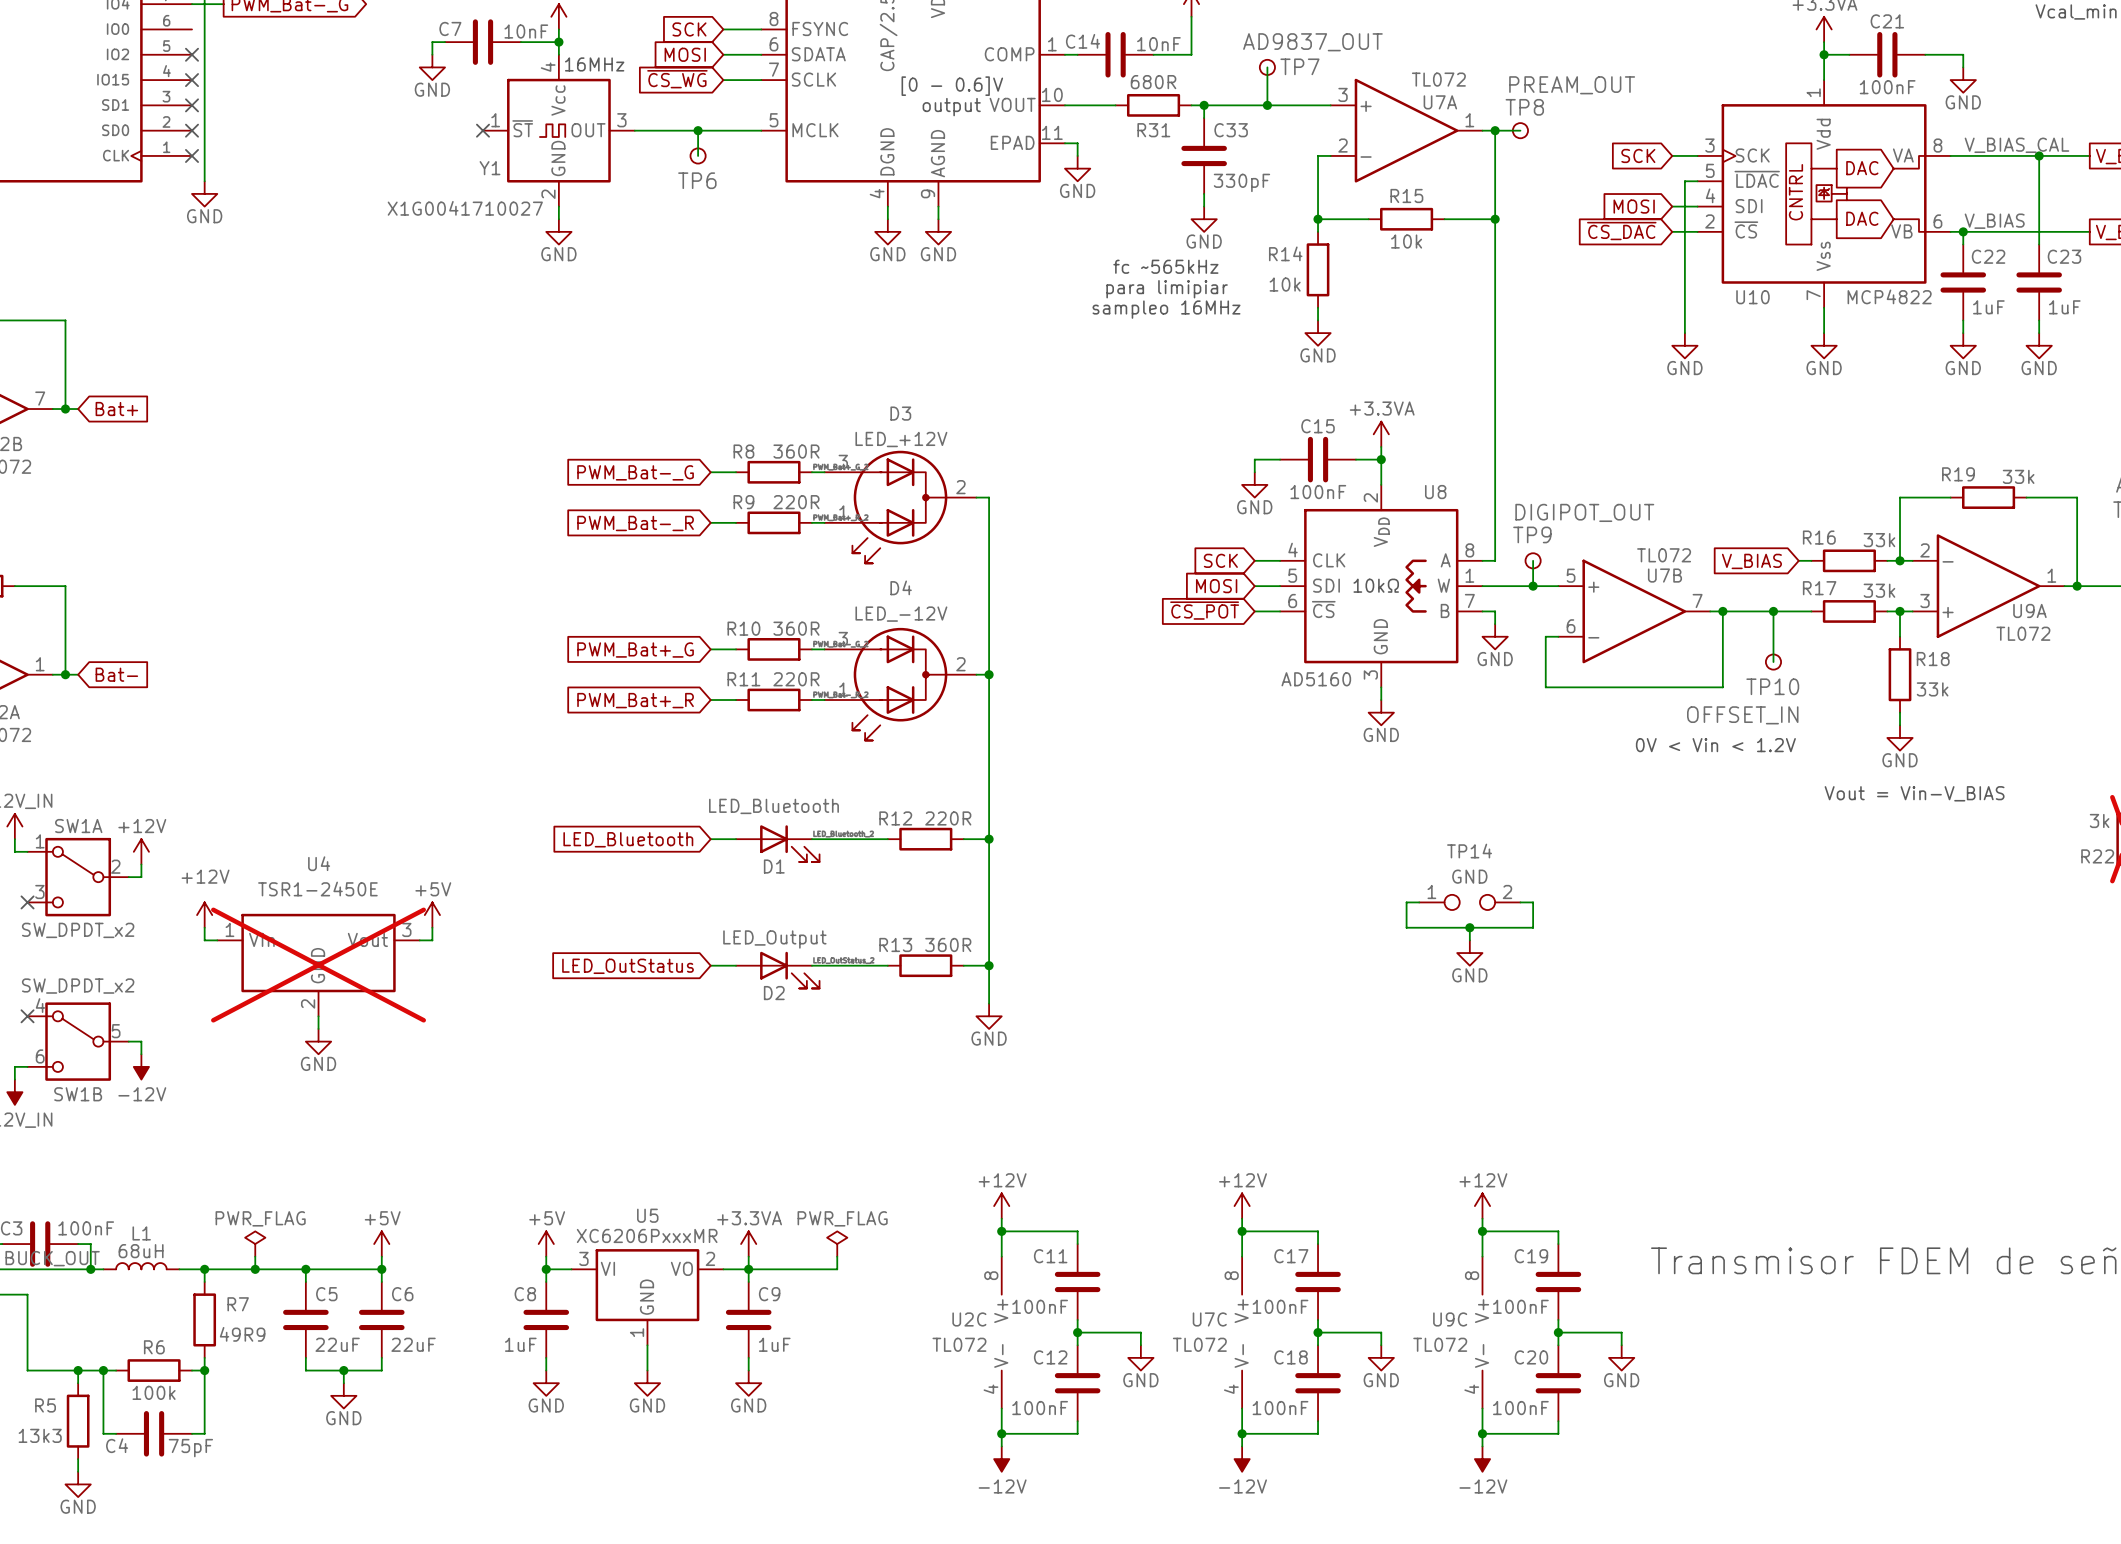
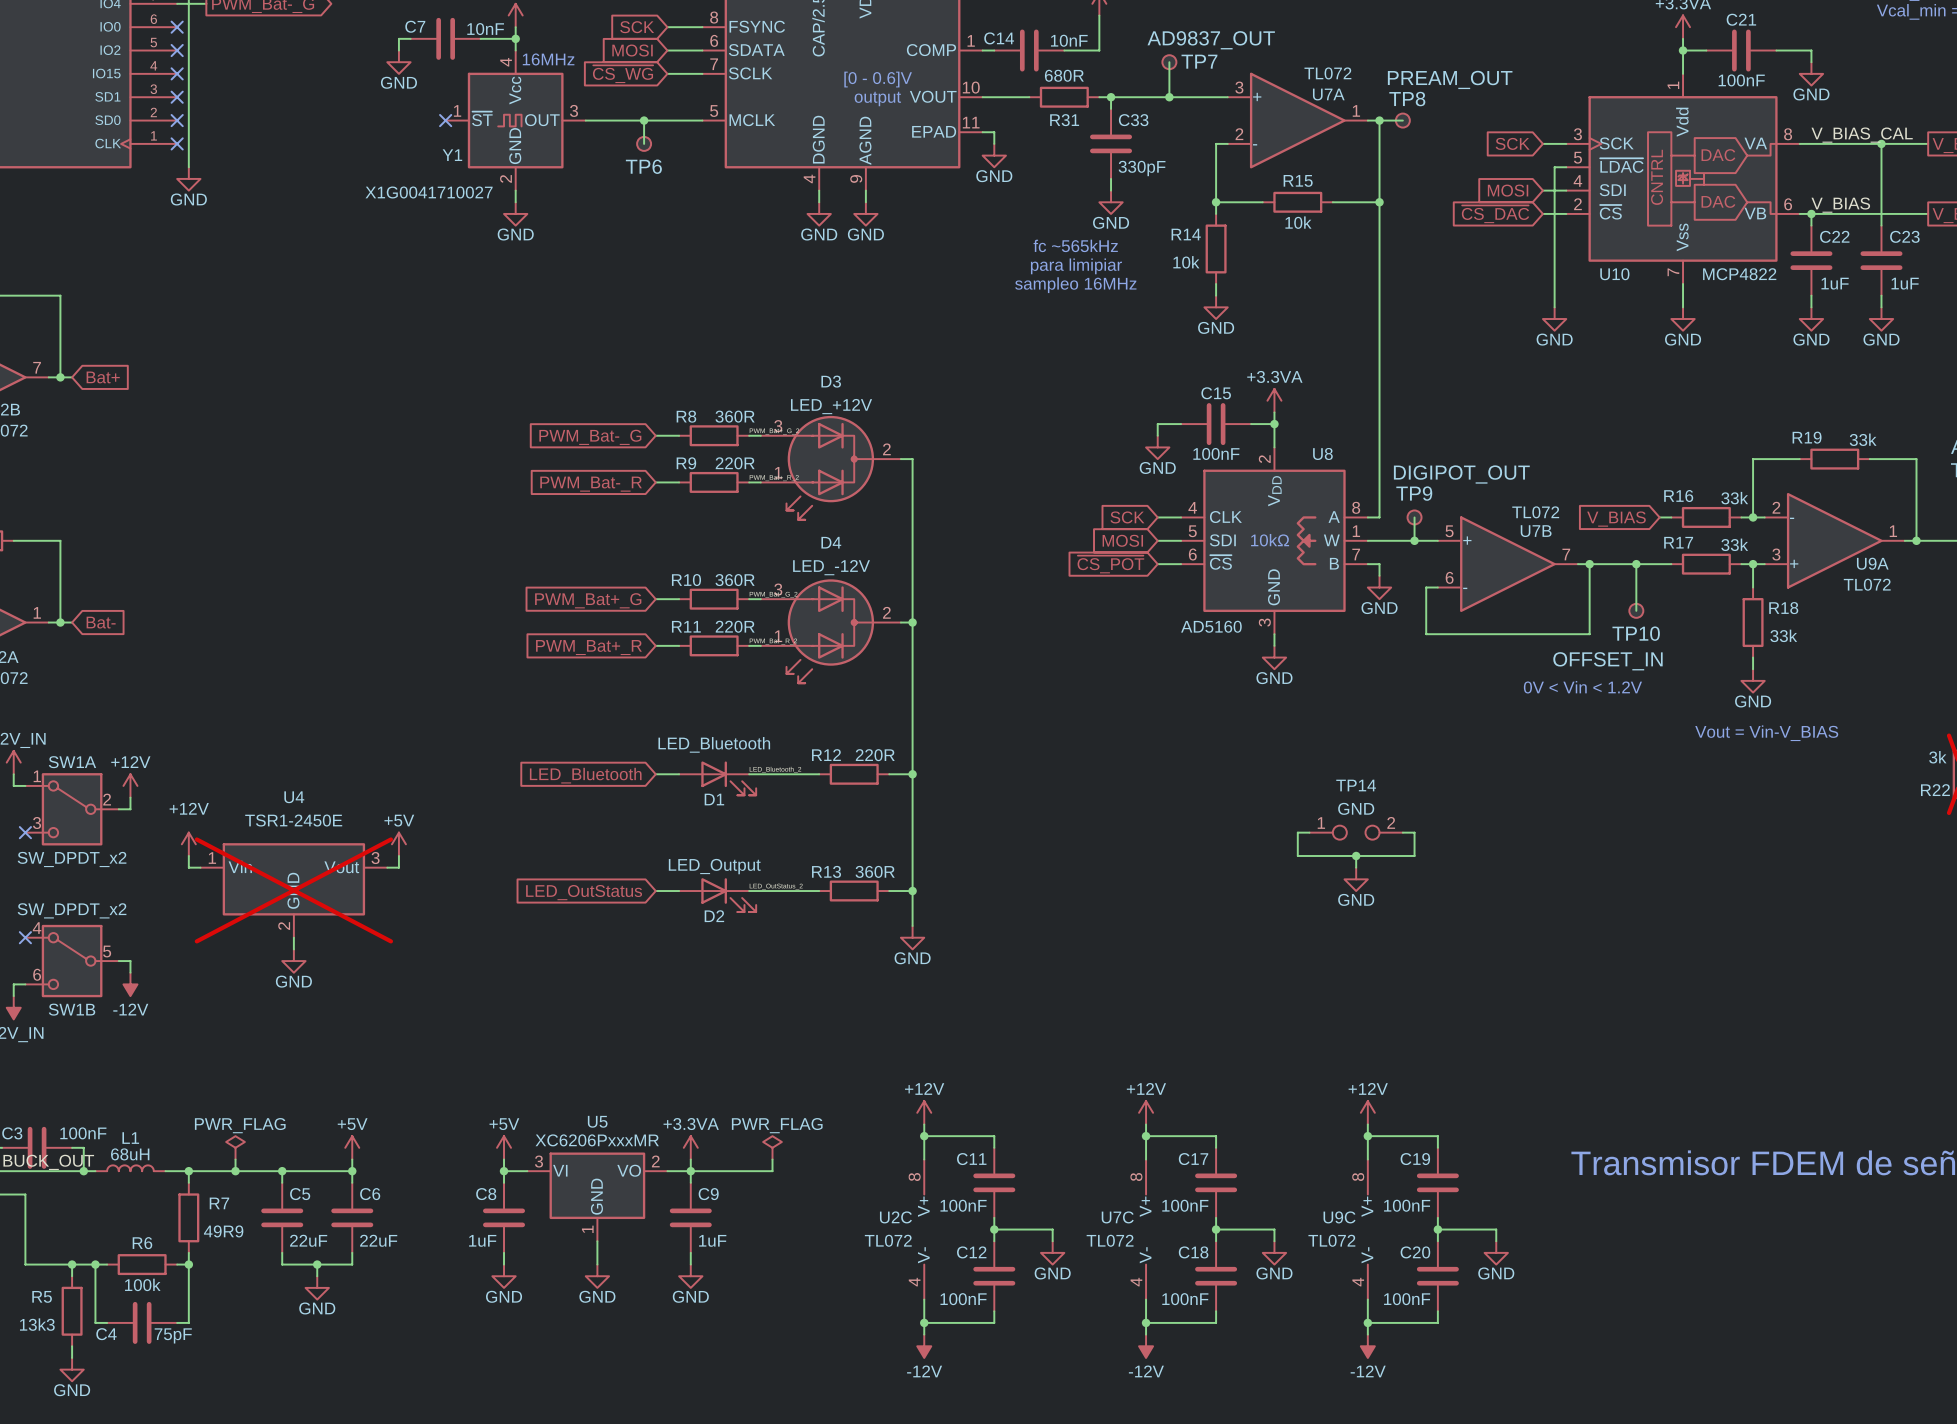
no-connect mark: none -> (177, 27)

